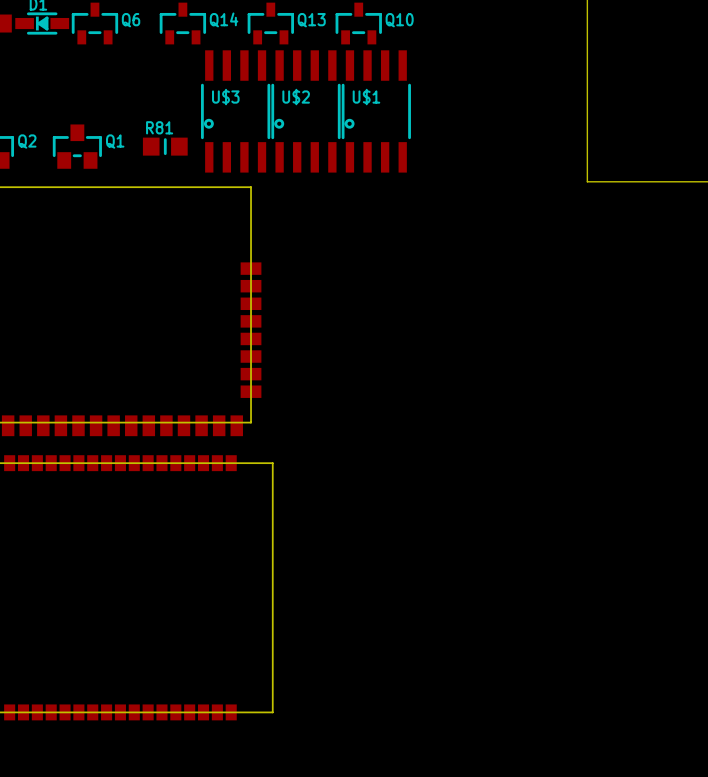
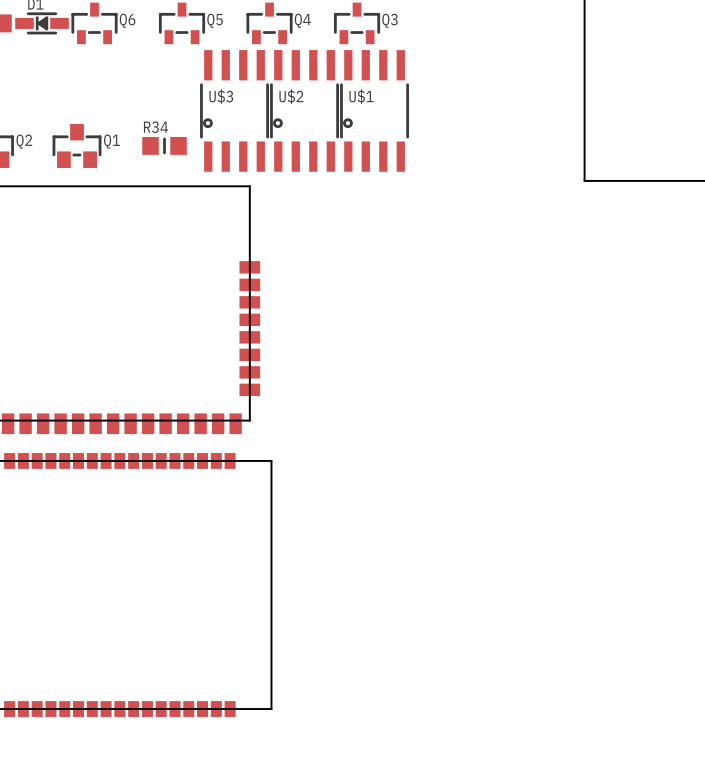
Q14 name: Q14 (224, 19) -> Q5 (215, 20)
Q13 name: Q13 (311, 20) -> Q4 (302, 20)
Q10 name: Q10 (399, 20) -> Q3 (390, 20)
R81 name: R81 (159, 127) -> R34 (156, 127)

